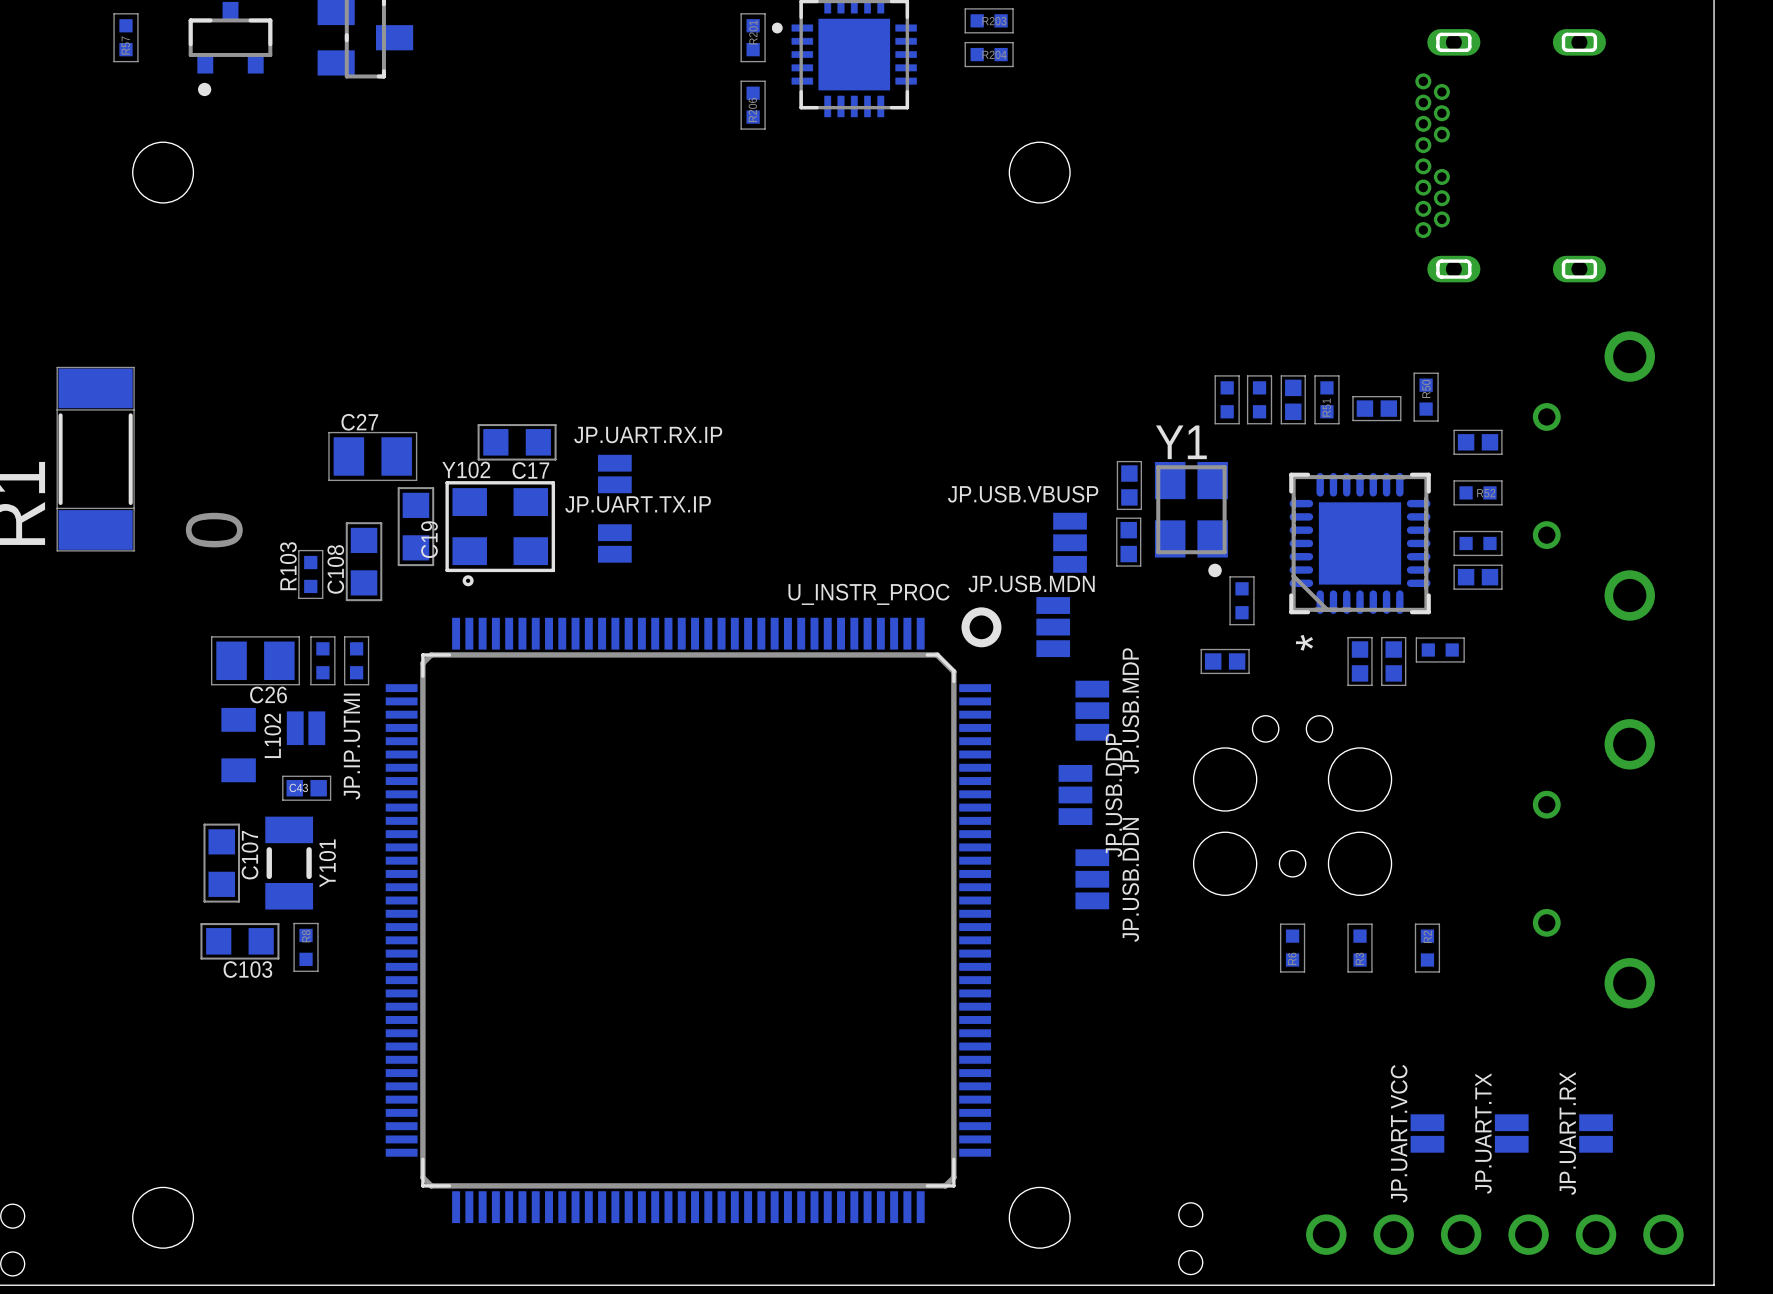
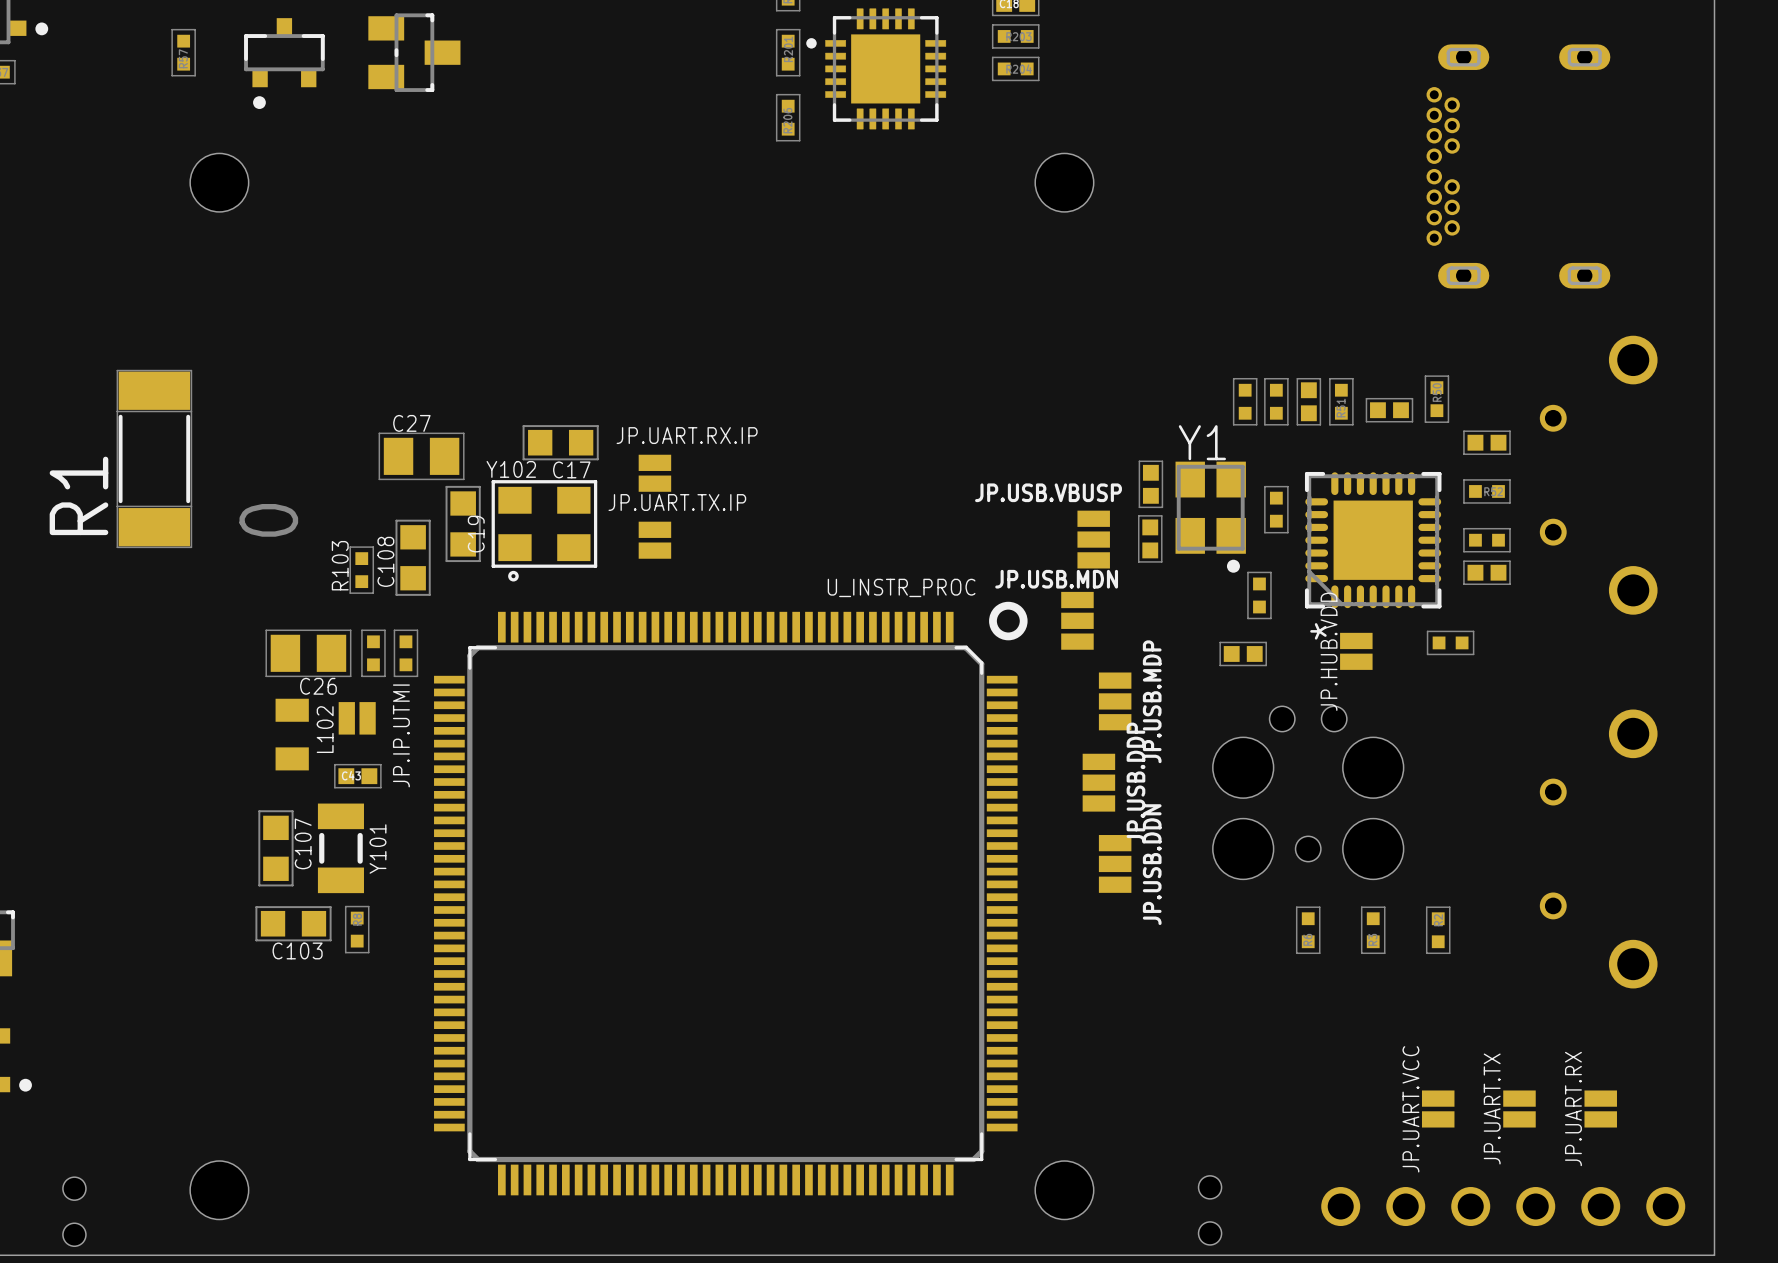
part: none -> (1276, 509)
JP.HUB.VDD: none -> (1356, 651)
part: (1360, 661) -> none
part: (1393, 661) -> none

